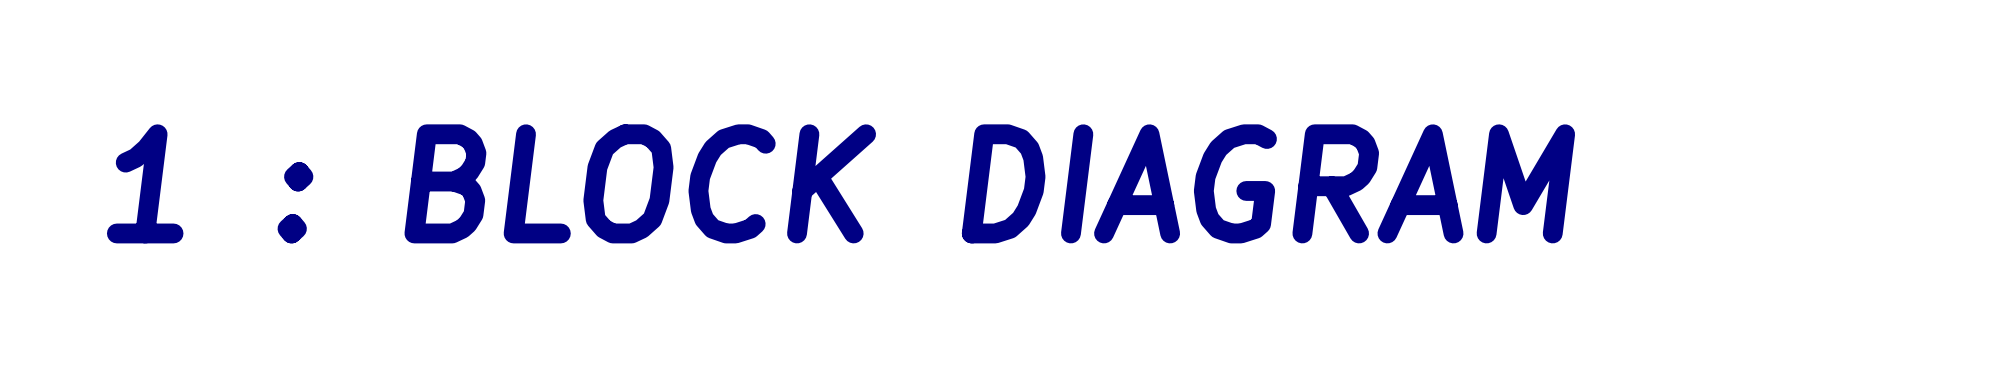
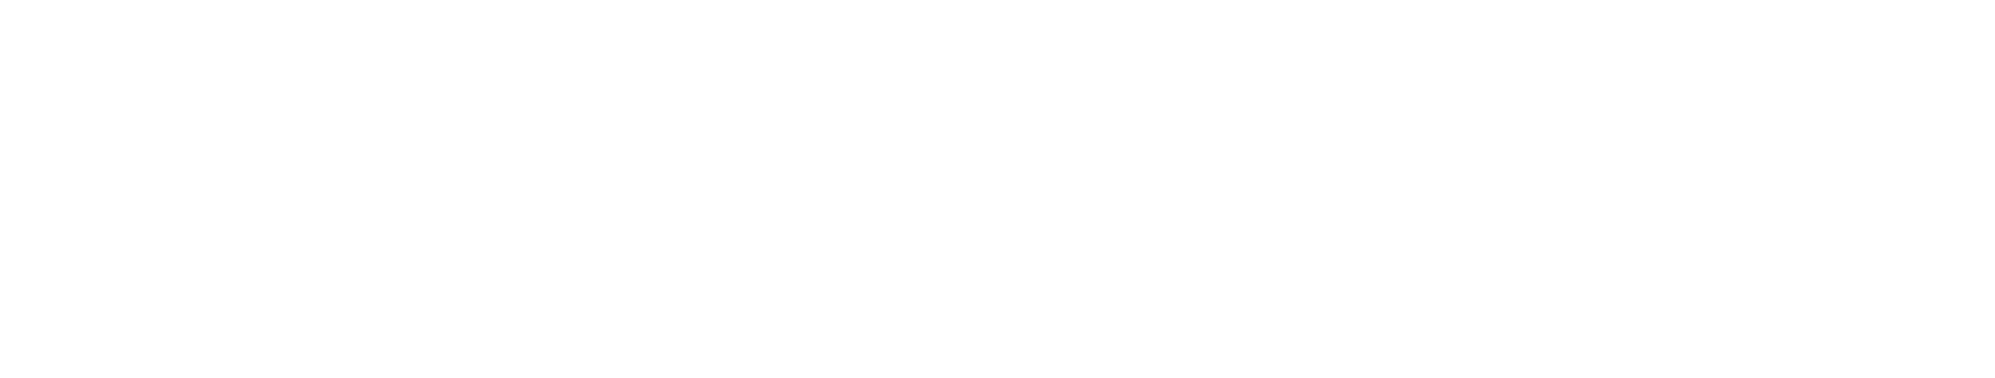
text: 1 : BLOCK DIAGRAM (841, 183) -> none

